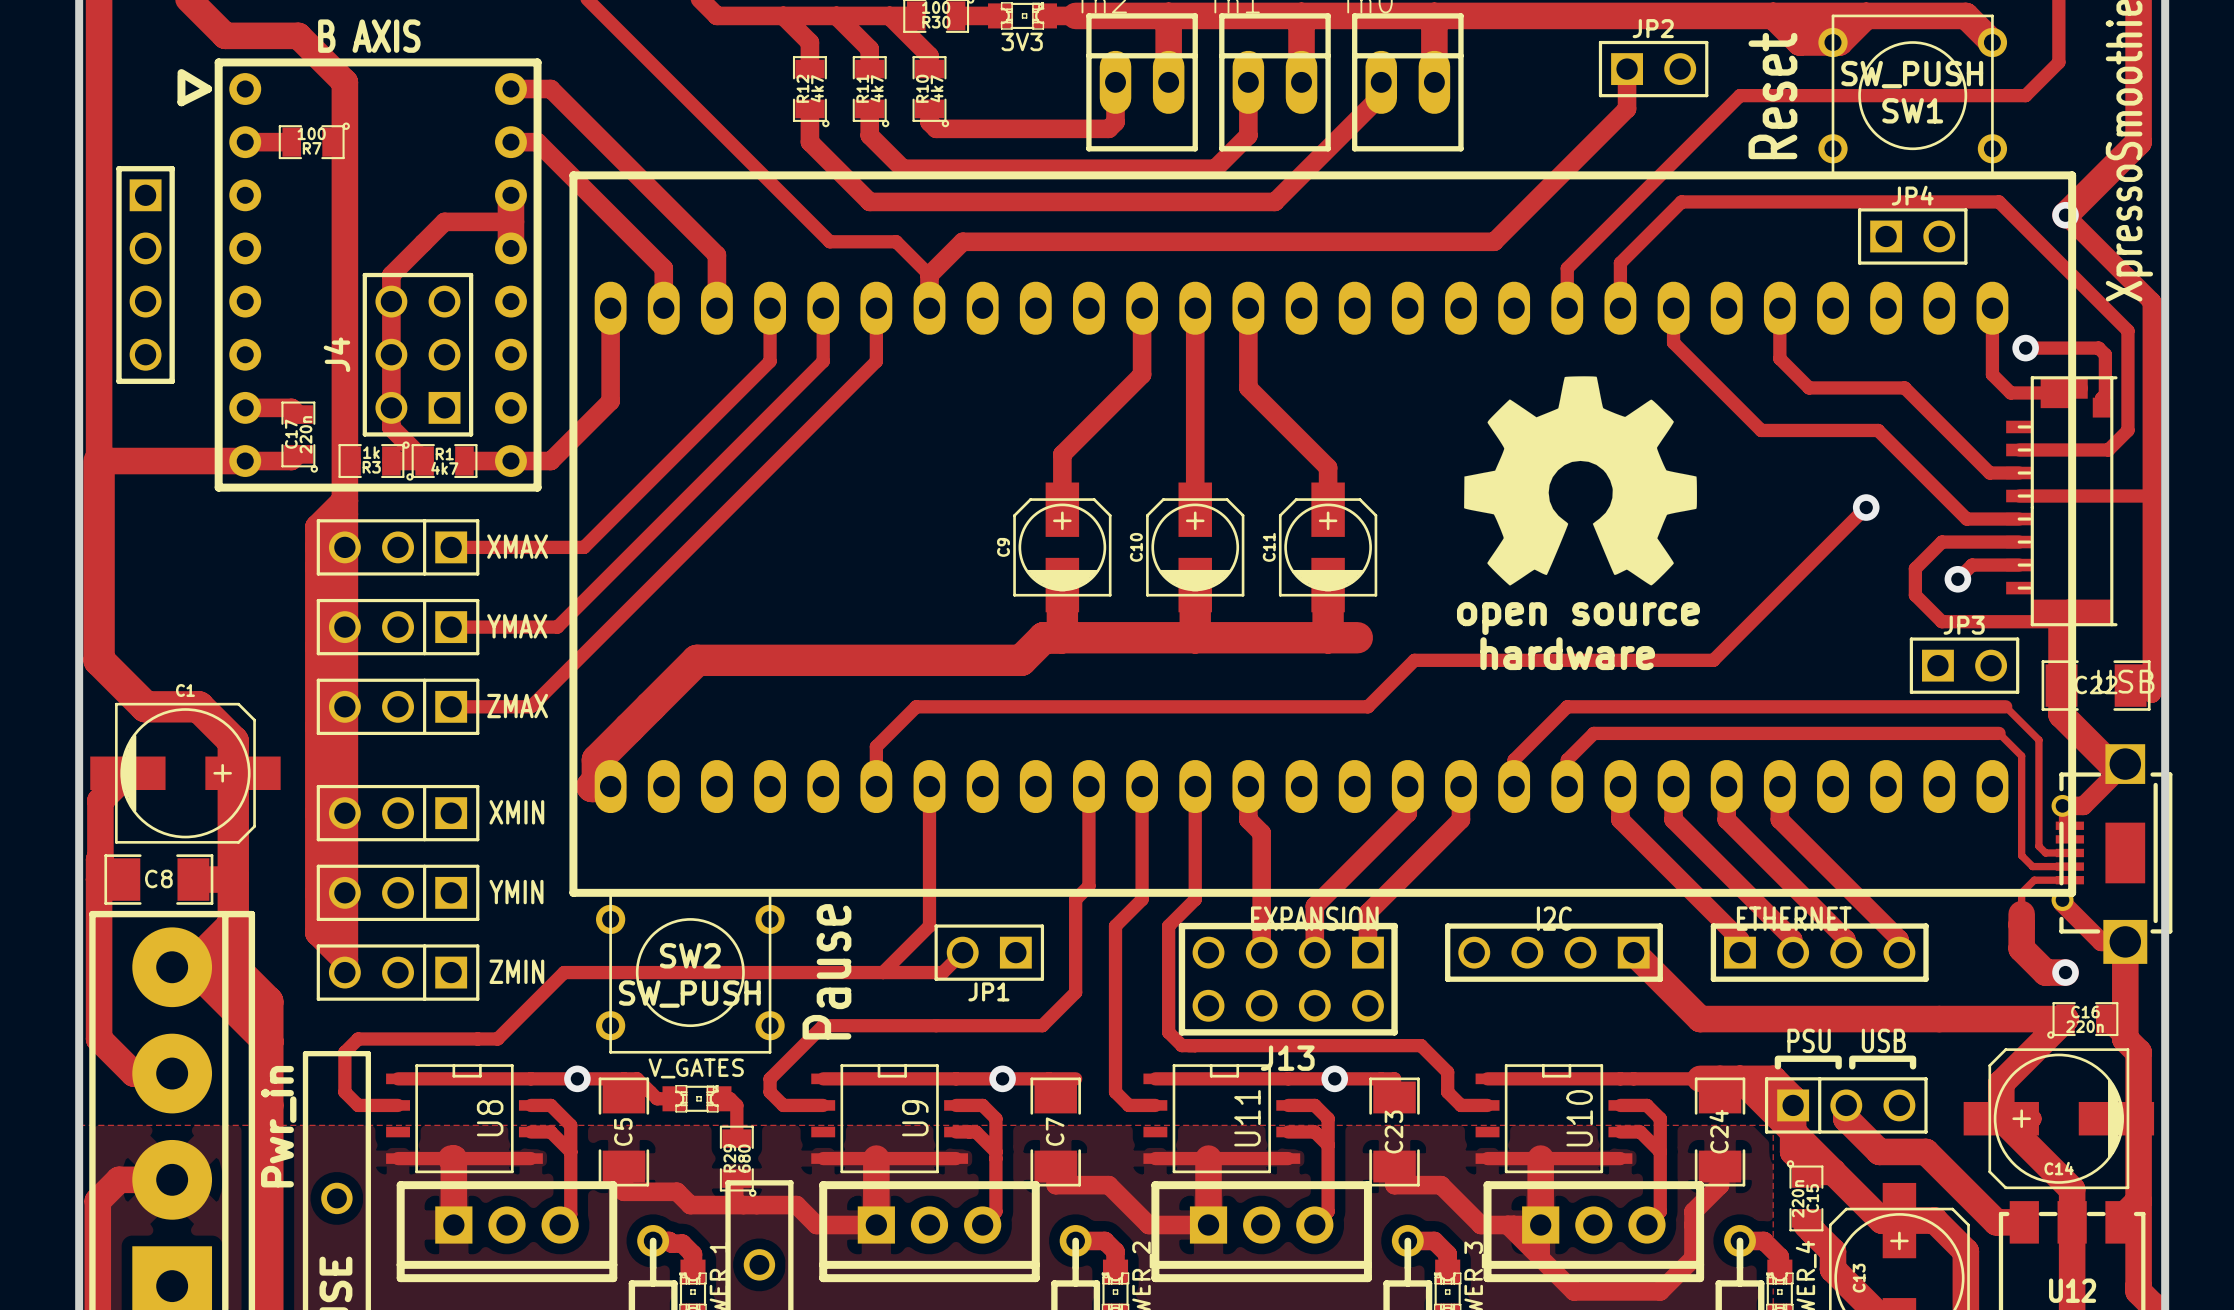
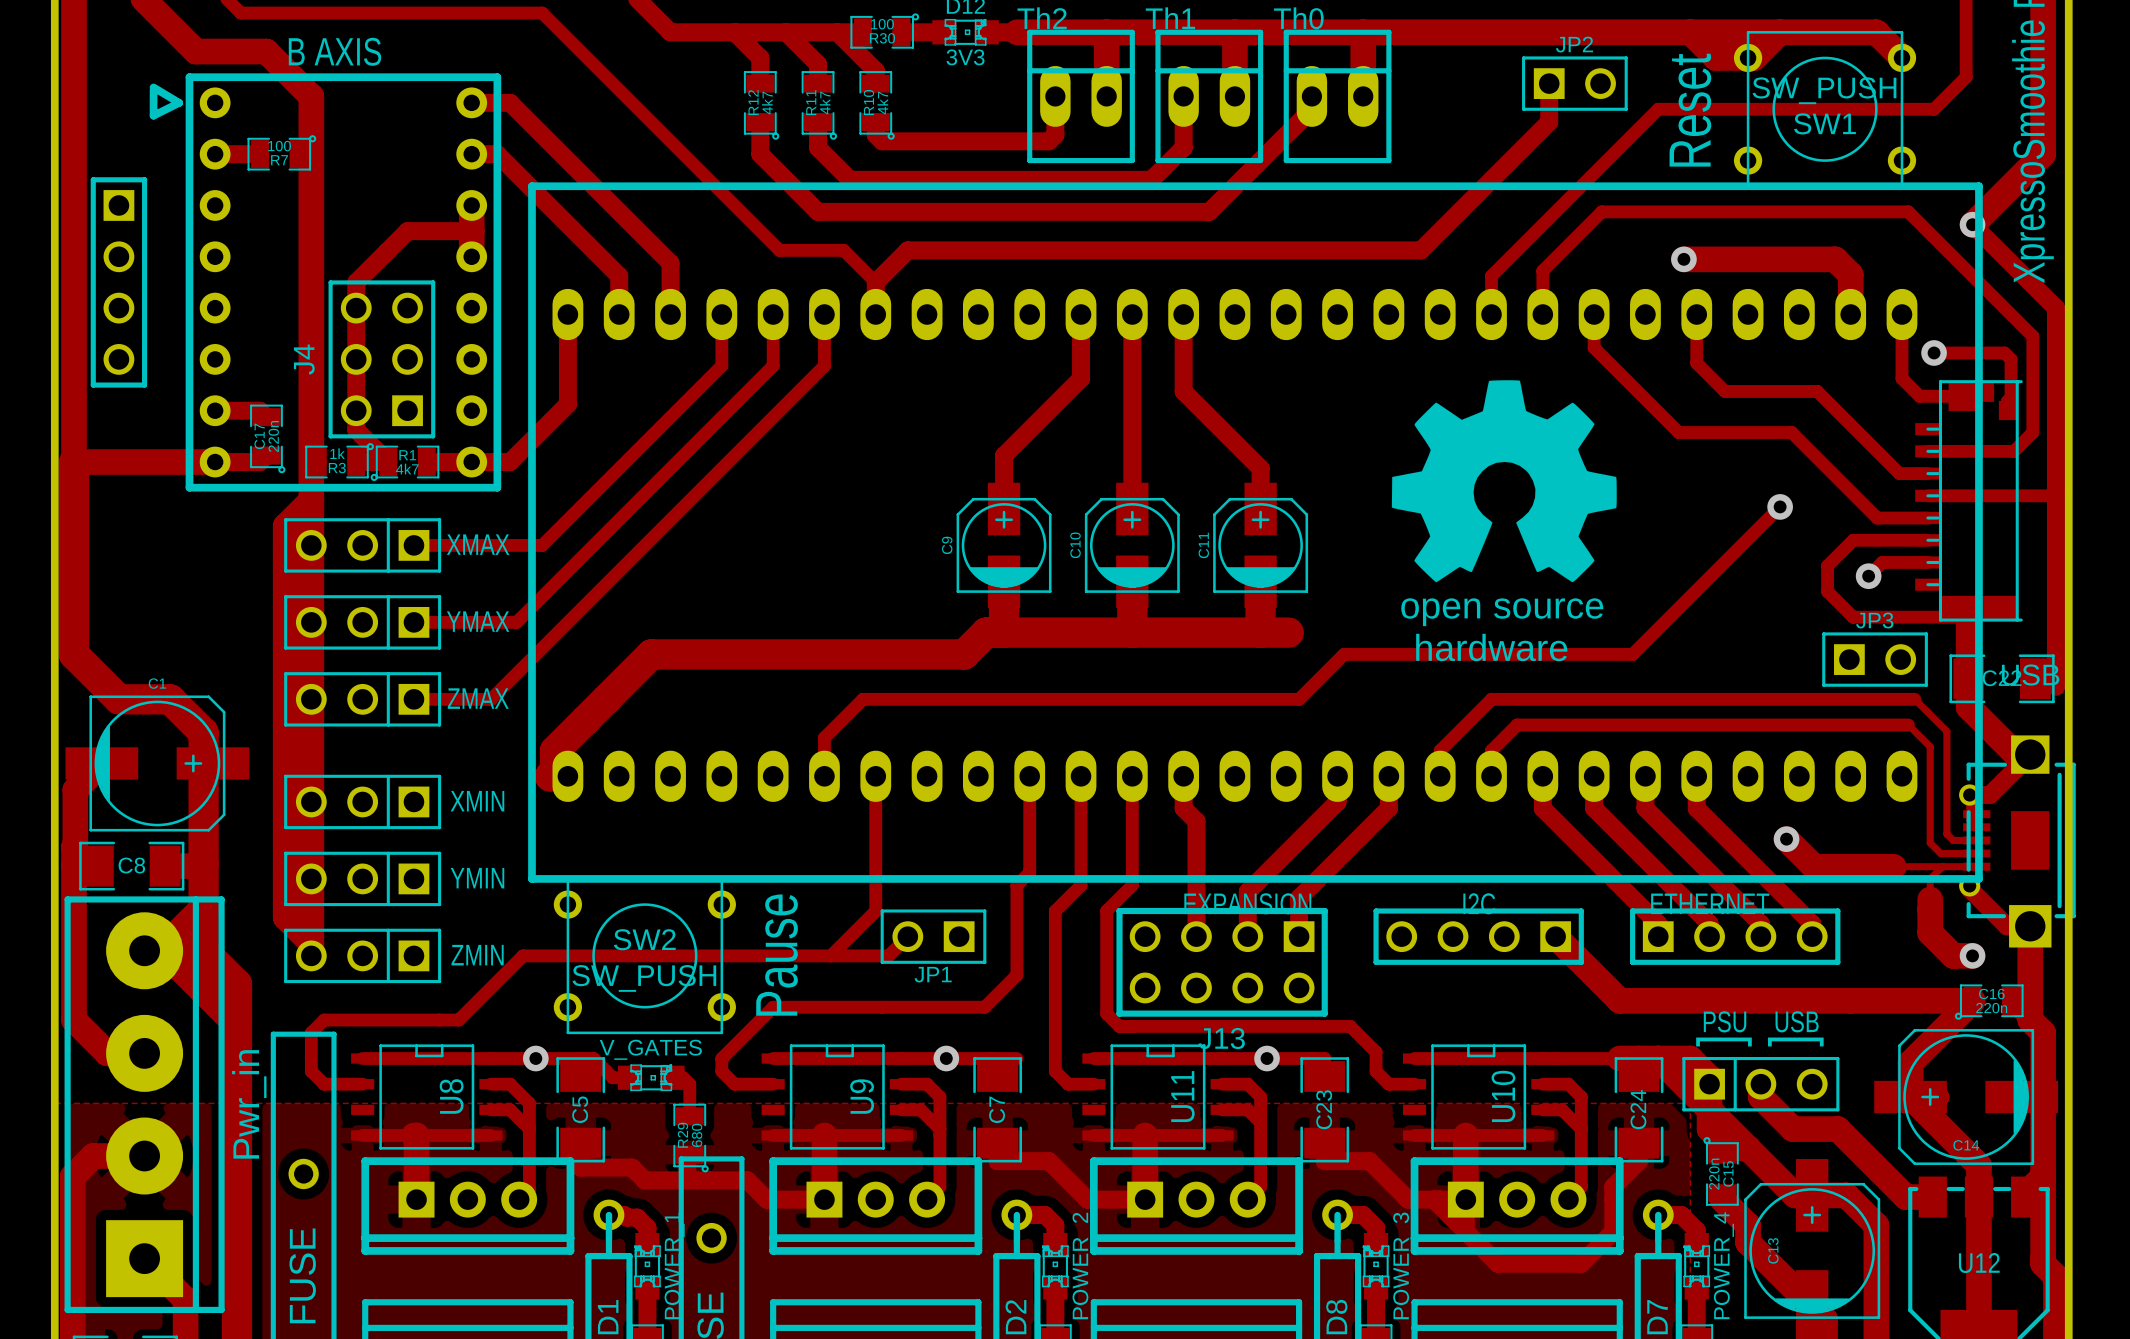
JP4: (1912, 236) -> none
track: none -> (1683, 259) (1835, 259) (1850, 274) (1850, 314)
via: none -> (1683, 259)
track: none -> (1786, 839) (1814, 866) (1893, 866)
via: none -> (1786, 839)
track: none -> (1893, 866) (1942, 866)

